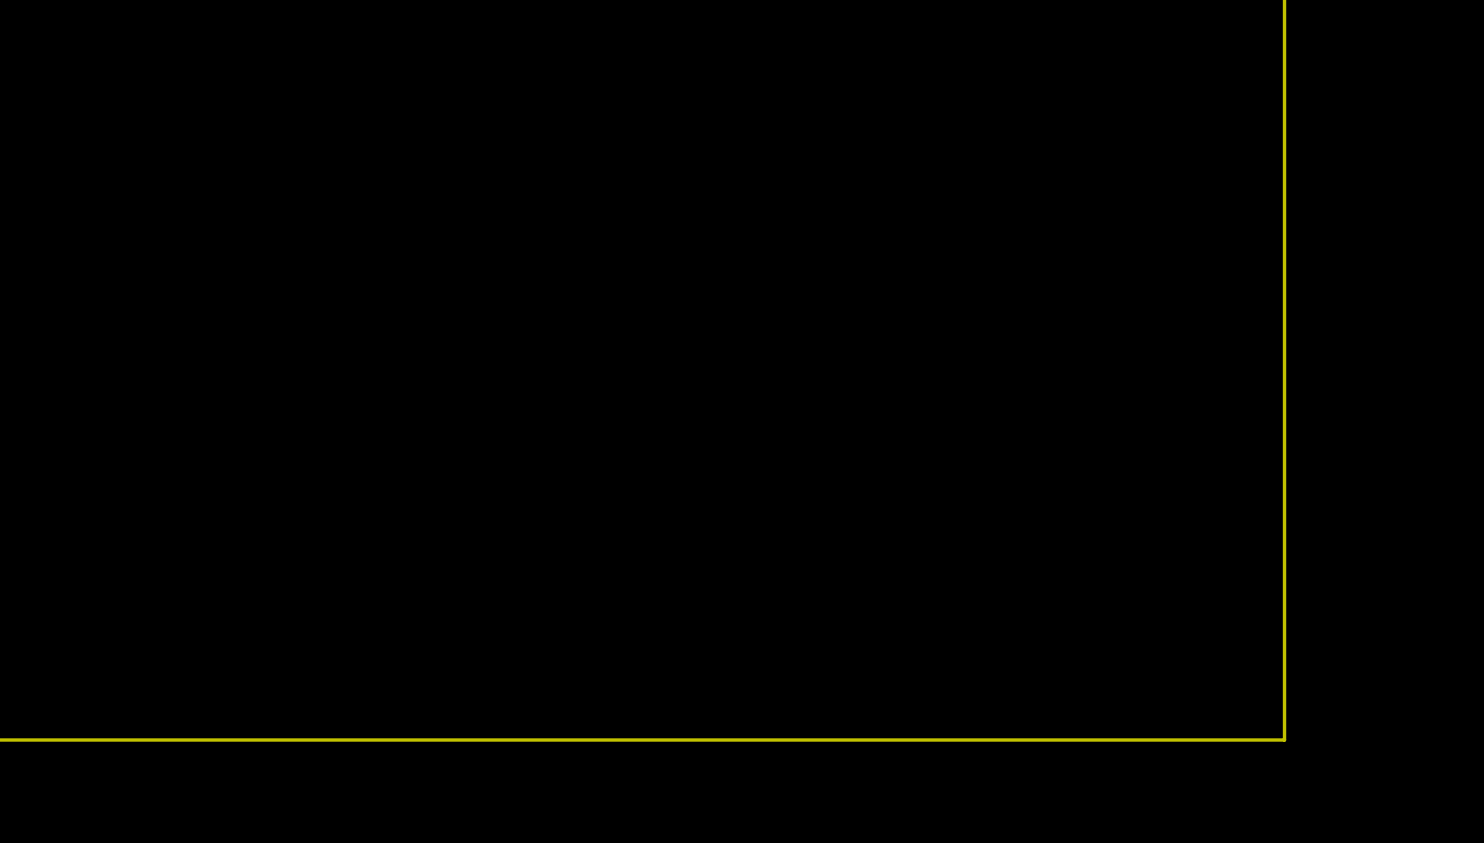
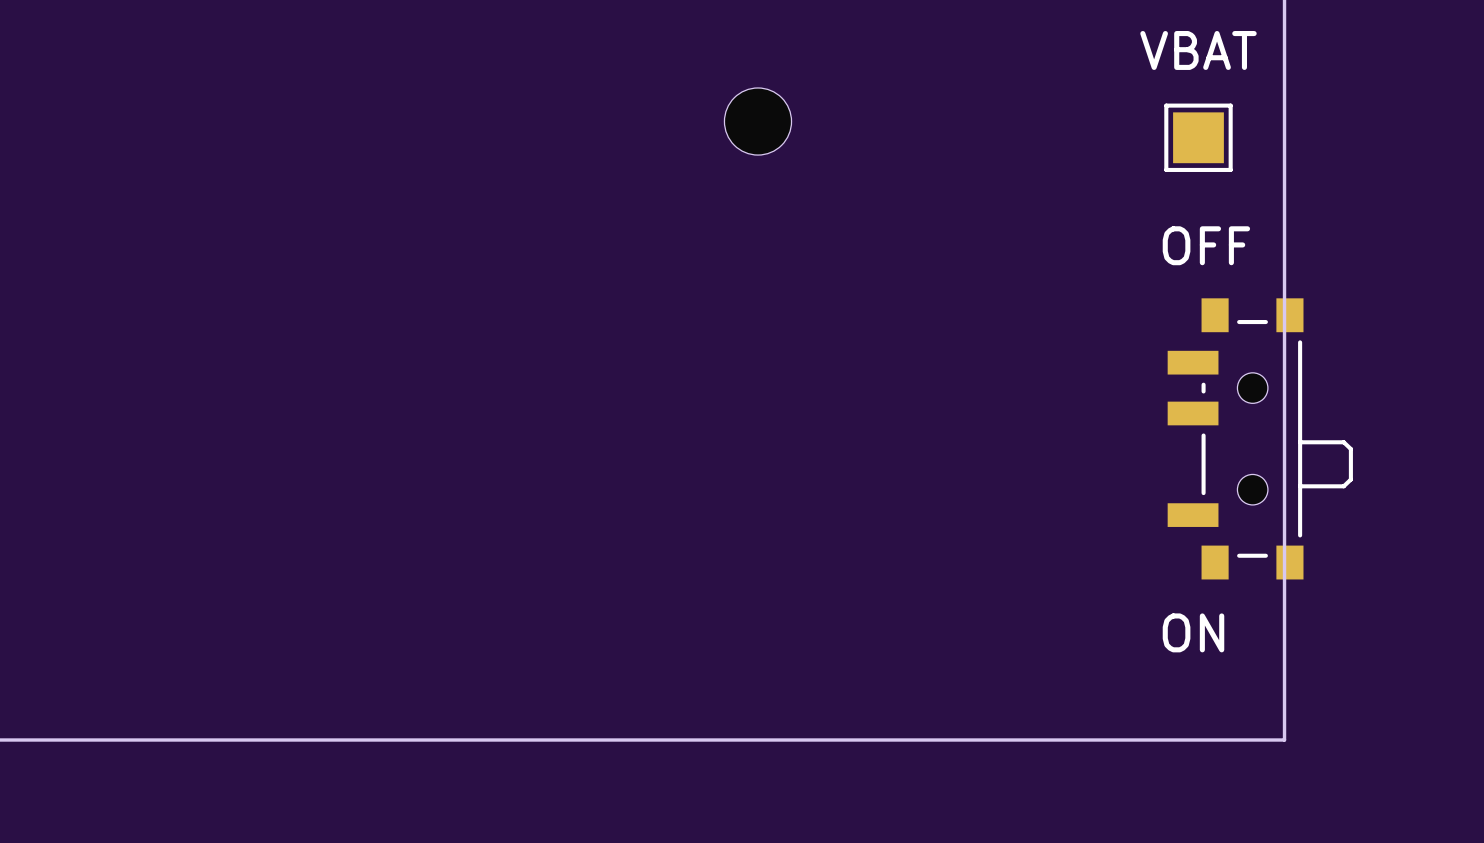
part: none -> (757, 121)
VBAT: none -> (1198, 137)
text: none -> OFF (1206, 245)
part: none -> (1260, 438)
text: none -> ON (1193, 632)

